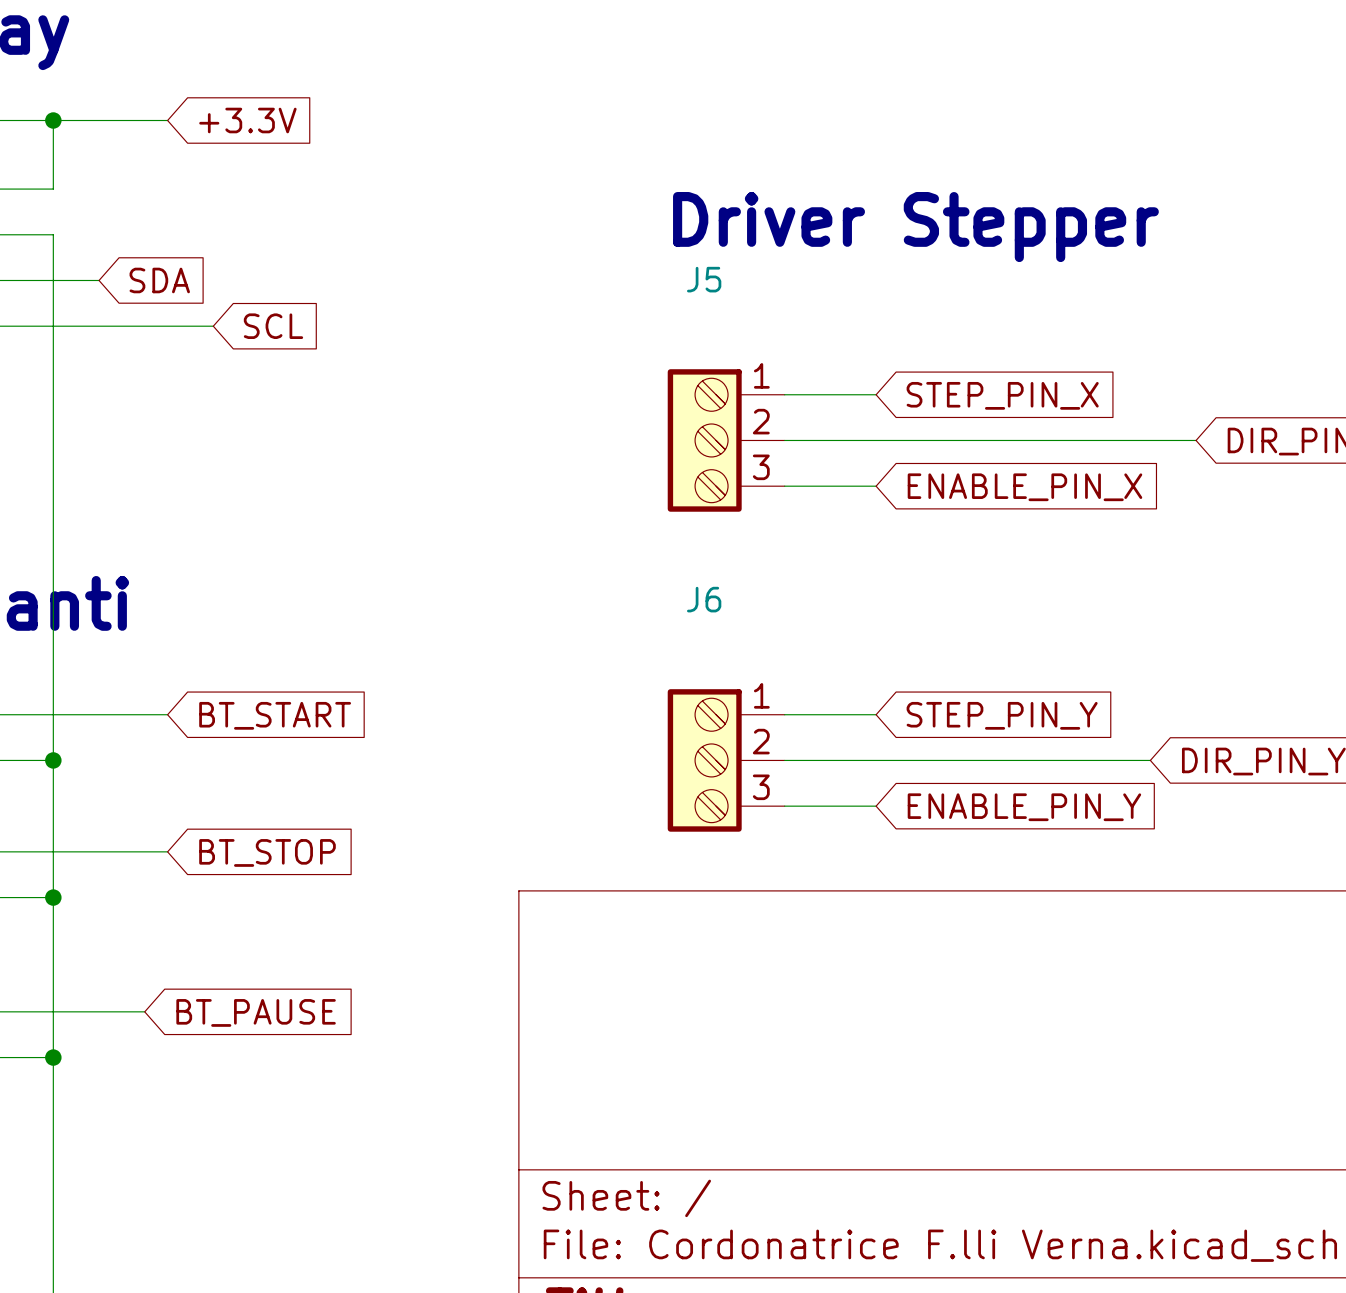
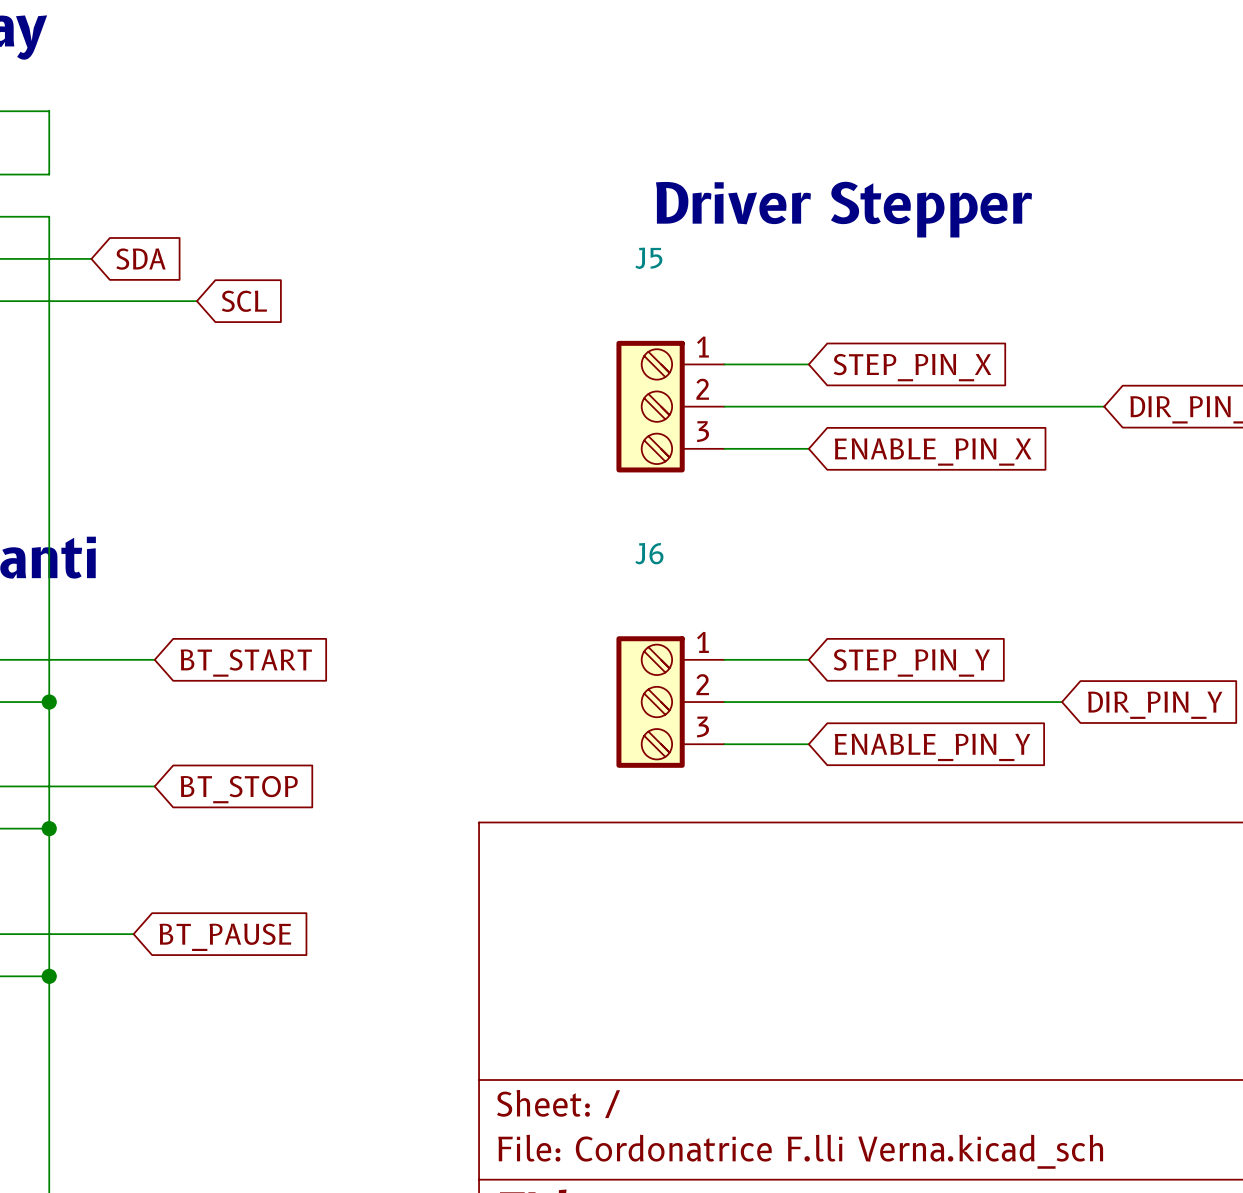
wire: (53, 120) (167, 120) -> none
junction: (53, 120) -> none
global label: +3.3V (247, 120) -> none

